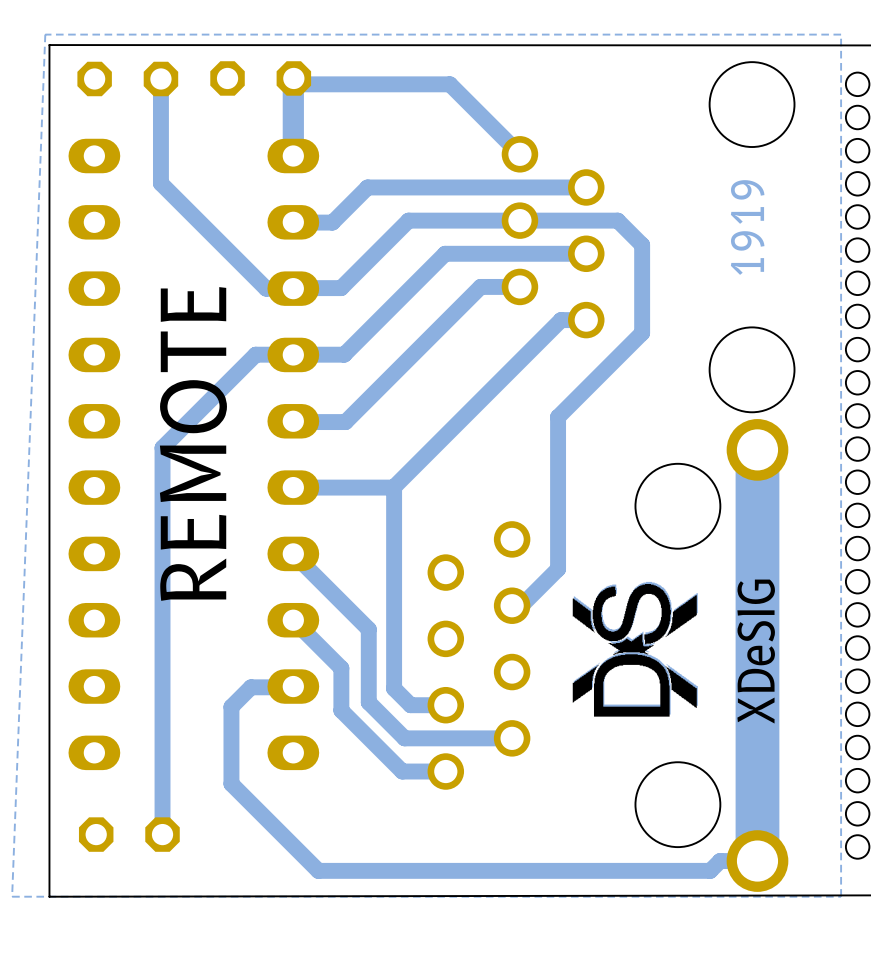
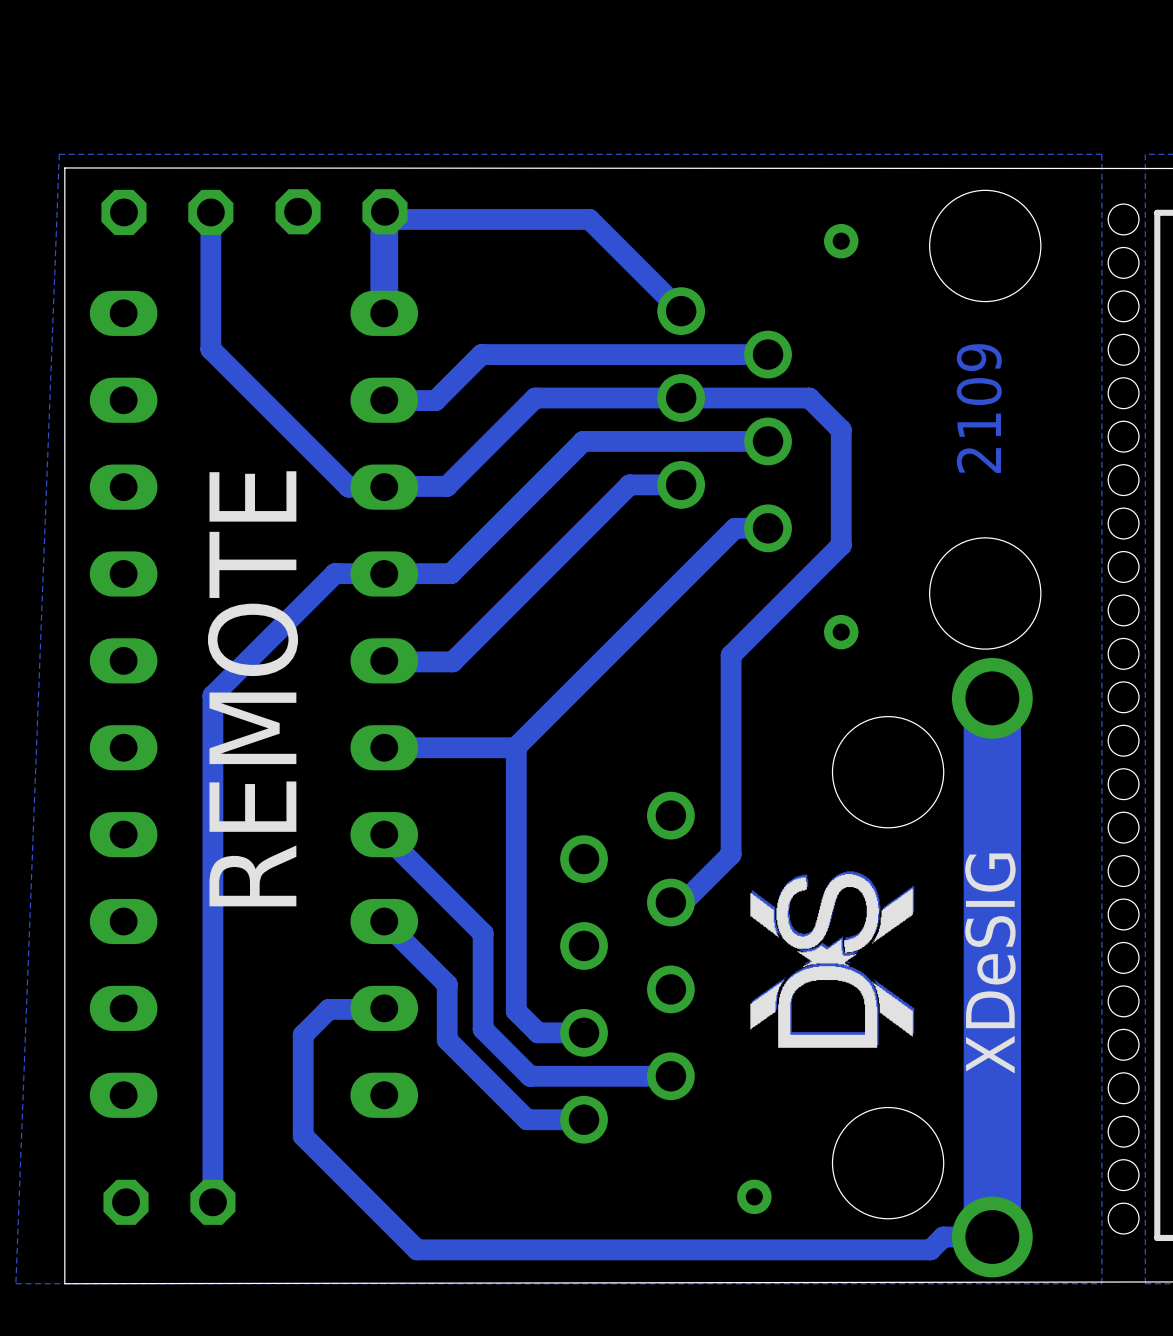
via: none -> (841, 241)
text: 1919 (747, 227) -> 2109 (979, 408)
via: none -> (841, 632)
via: none -> (754, 1196)

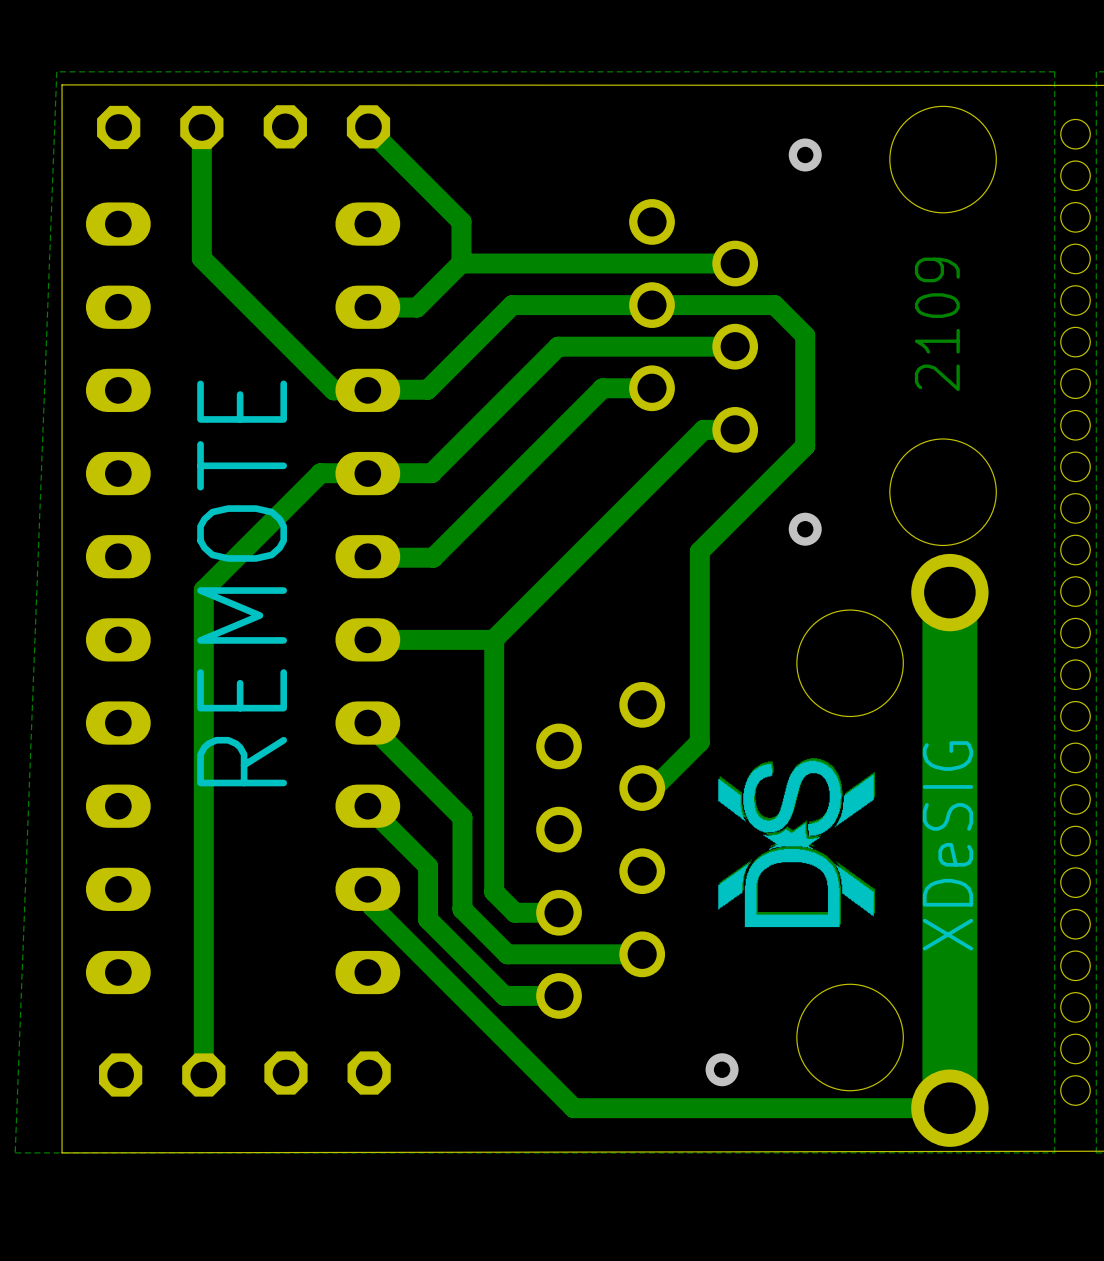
track: (384, 211) (384, 313) -> (368, 126) (461, 221) (460, 263)
track: (384, 211) (385, 219) (589, 219) (681, 311) -> none
track: (384, 1008) (328, 1009) (303, 1035) (303, 1135) (417, 1249) (930, 1249) (943, 1237) -> (367, 889) (372, 893) (372, 906) (573, 1108) (903, 1108)
part: none -> (327, 1073)

